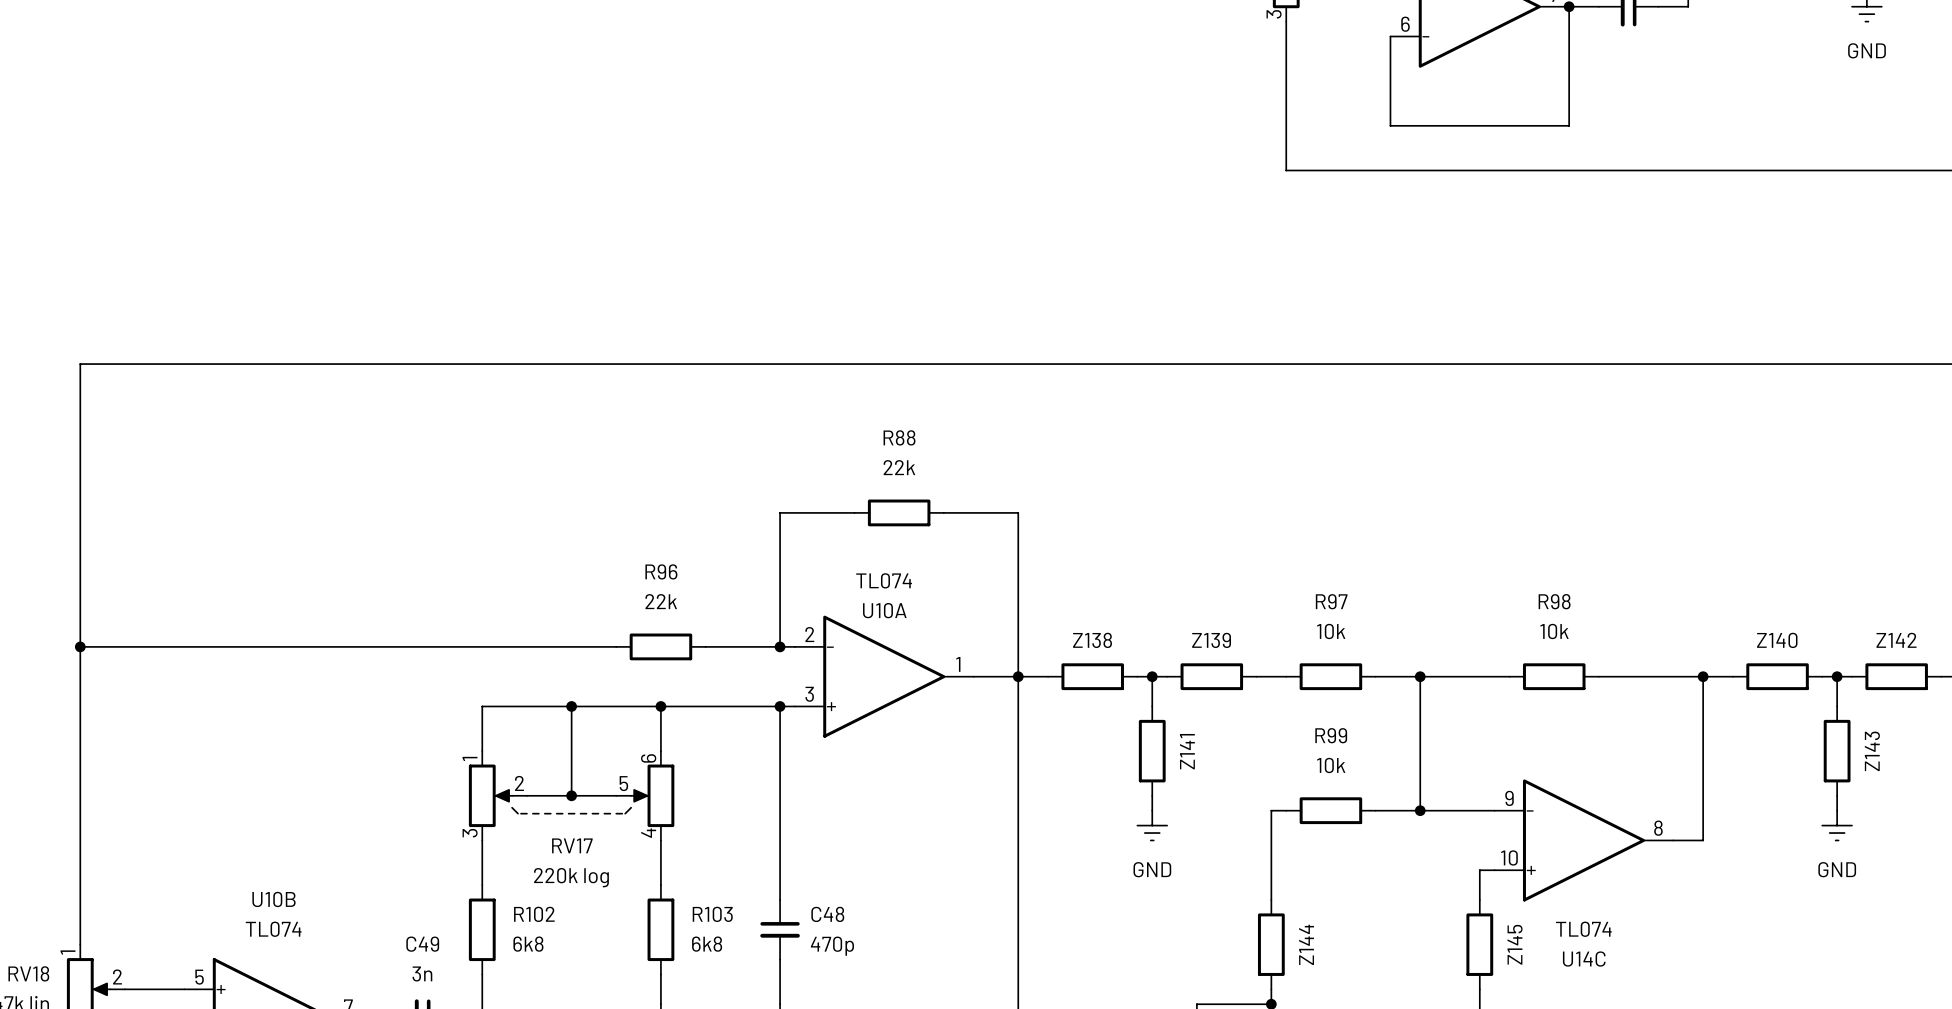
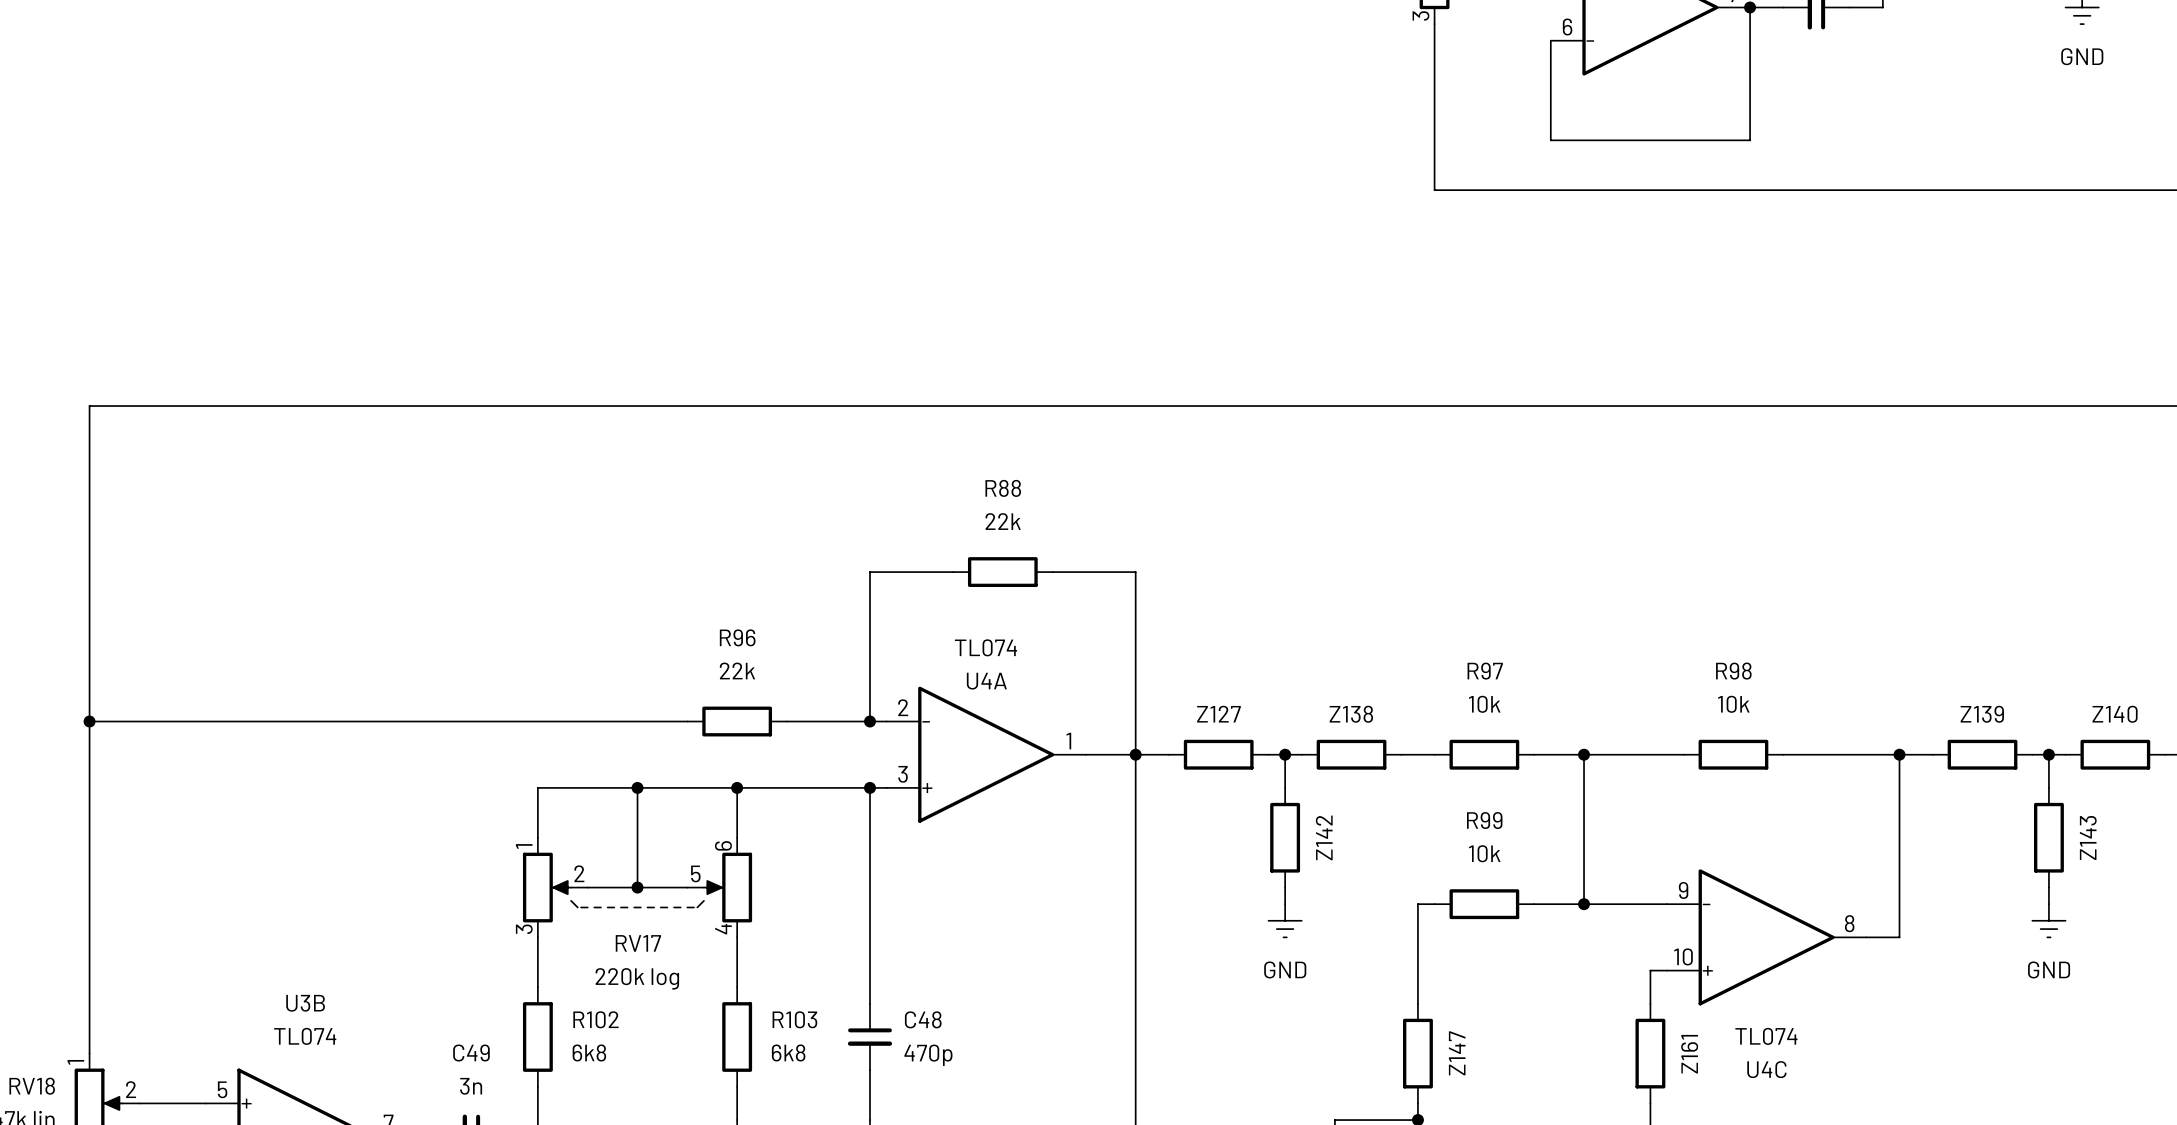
U10A name: U10A (884, 610) -> U4A (986, 681)
Z138 name: Z138 (1092, 640) -> Z127 (1218, 714)
Z139 name: Z139 (1211, 640) -> Z138 (1351, 714)
Z140 name: Z140 (1777, 640) -> Z139 (1982, 714)
Z142 name: Z142 (1896, 640) -> Z140 (2115, 714)
Z141 name: Z141 (1187, 751) -> Z142 (1324, 837)
U10B name: U10B (273, 899) -> U3B (305, 1003)
Z144 name: Z144 (1306, 944) -> Z147 (1457, 1053)
Z145 name: Z145 (1515, 944) -> Z161 (1689, 1054)
U14C name: U14C (1584, 959) -> U4C (1766, 1069)

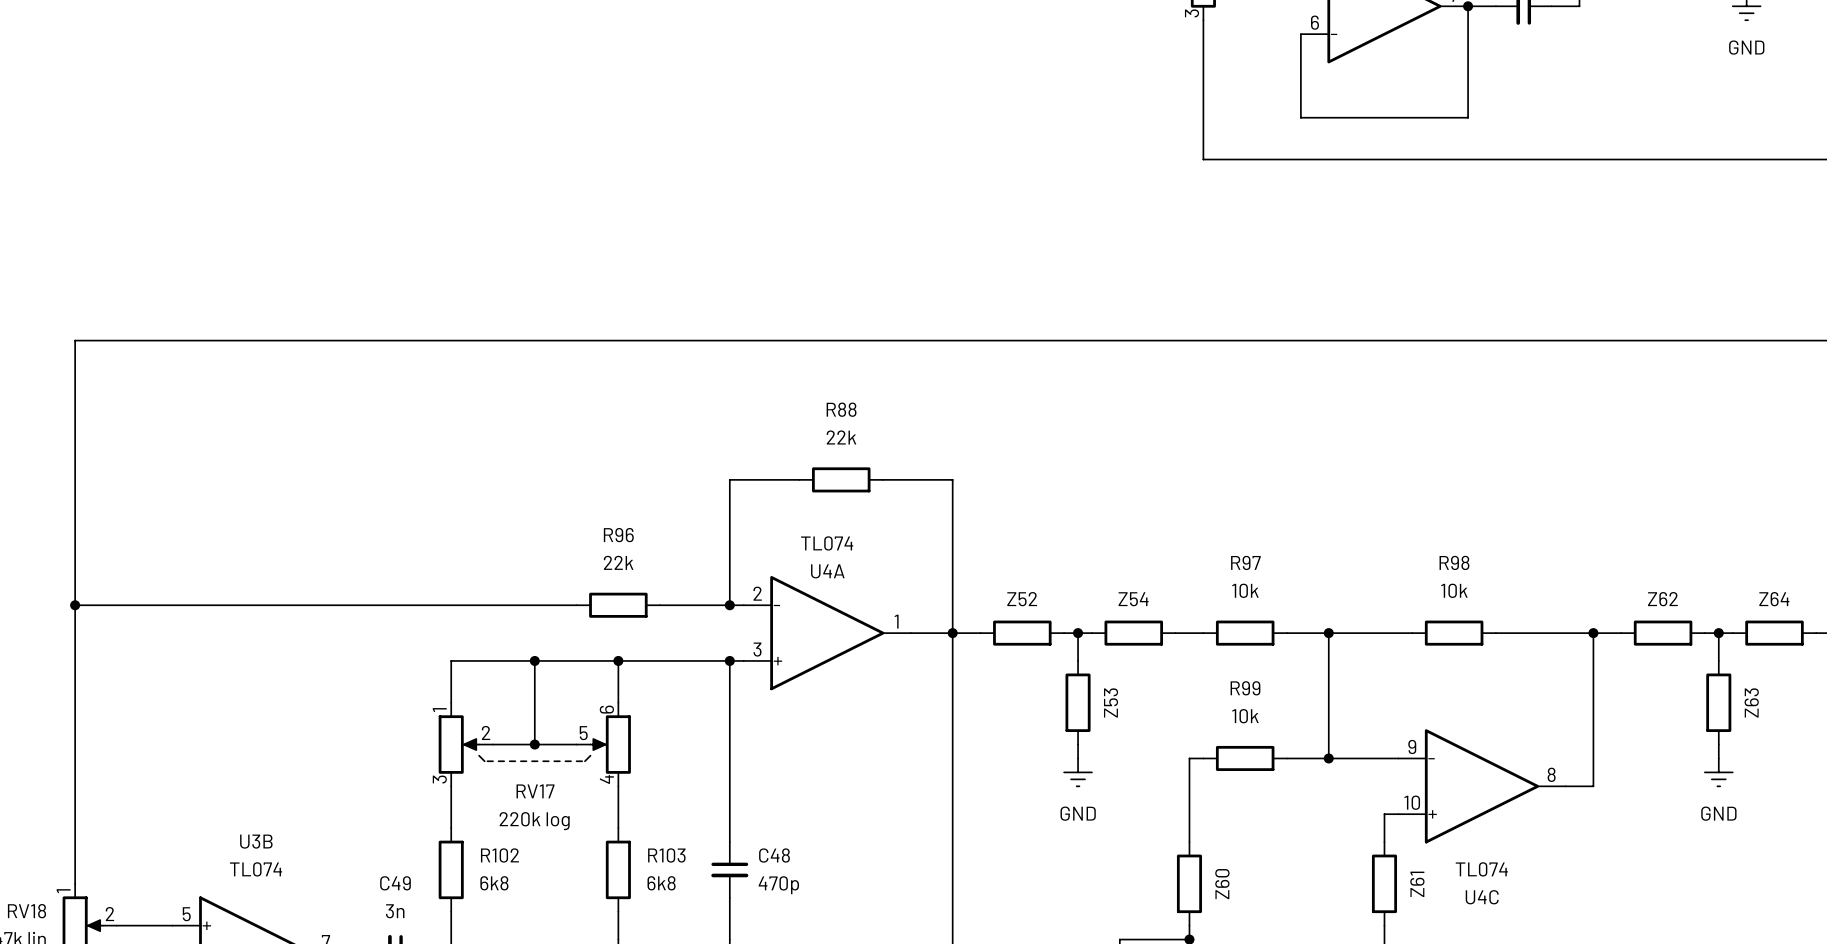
Z127 name: Z127 (1218, 714) -> Z52 (1022, 599)
Z138 name: Z138 (1351, 714) -> Z54 (1133, 599)
Z139 name: Z139 (1982, 714) -> Z62 (1662, 599)
Z140 name: Z140 (2115, 714) -> Z64 (1774, 599)
Z142 name: Z142 (1324, 837) -> Z53 (1111, 702)
Z143 name: Z143 (2088, 837) -> Z63 (1751, 702)
Z147 name: Z147 (1457, 1053) -> Z60 (1222, 884)
Z161 name: Z161 (1689, 1054) -> Z61 (1417, 884)

